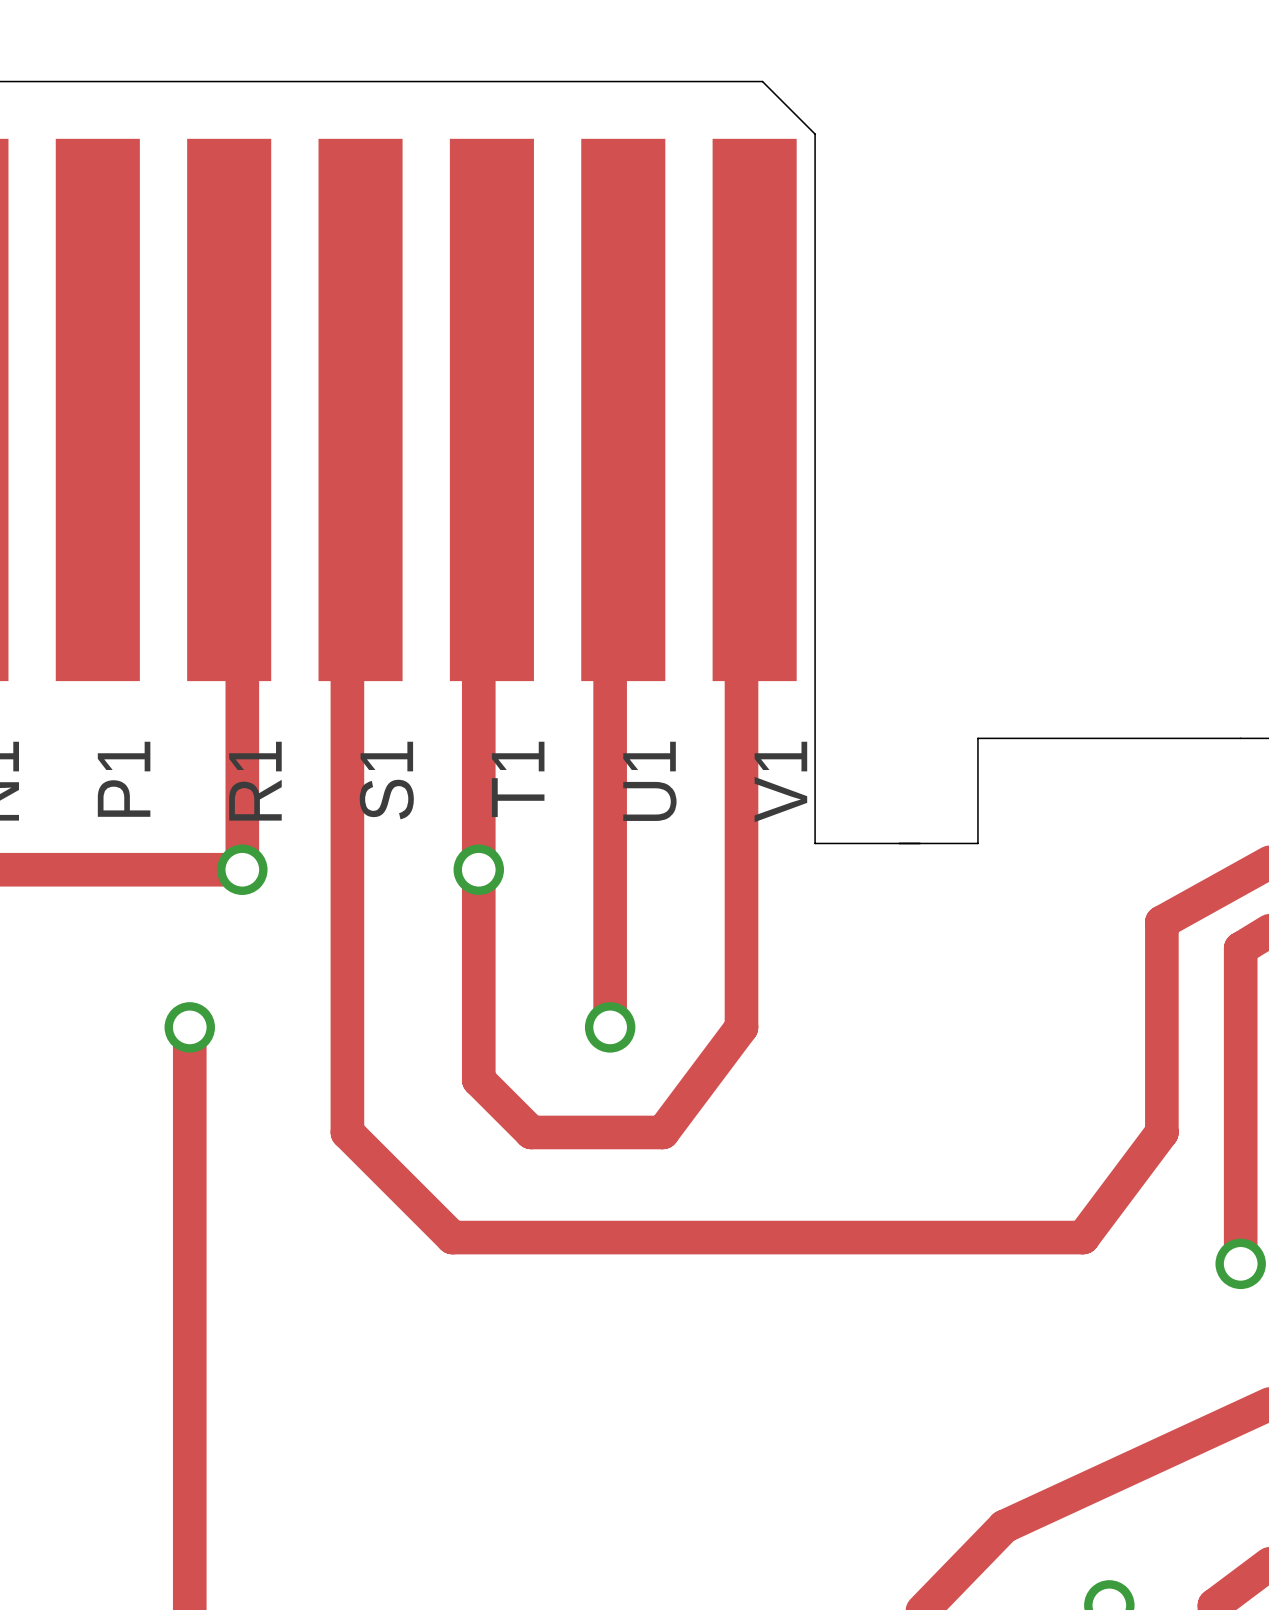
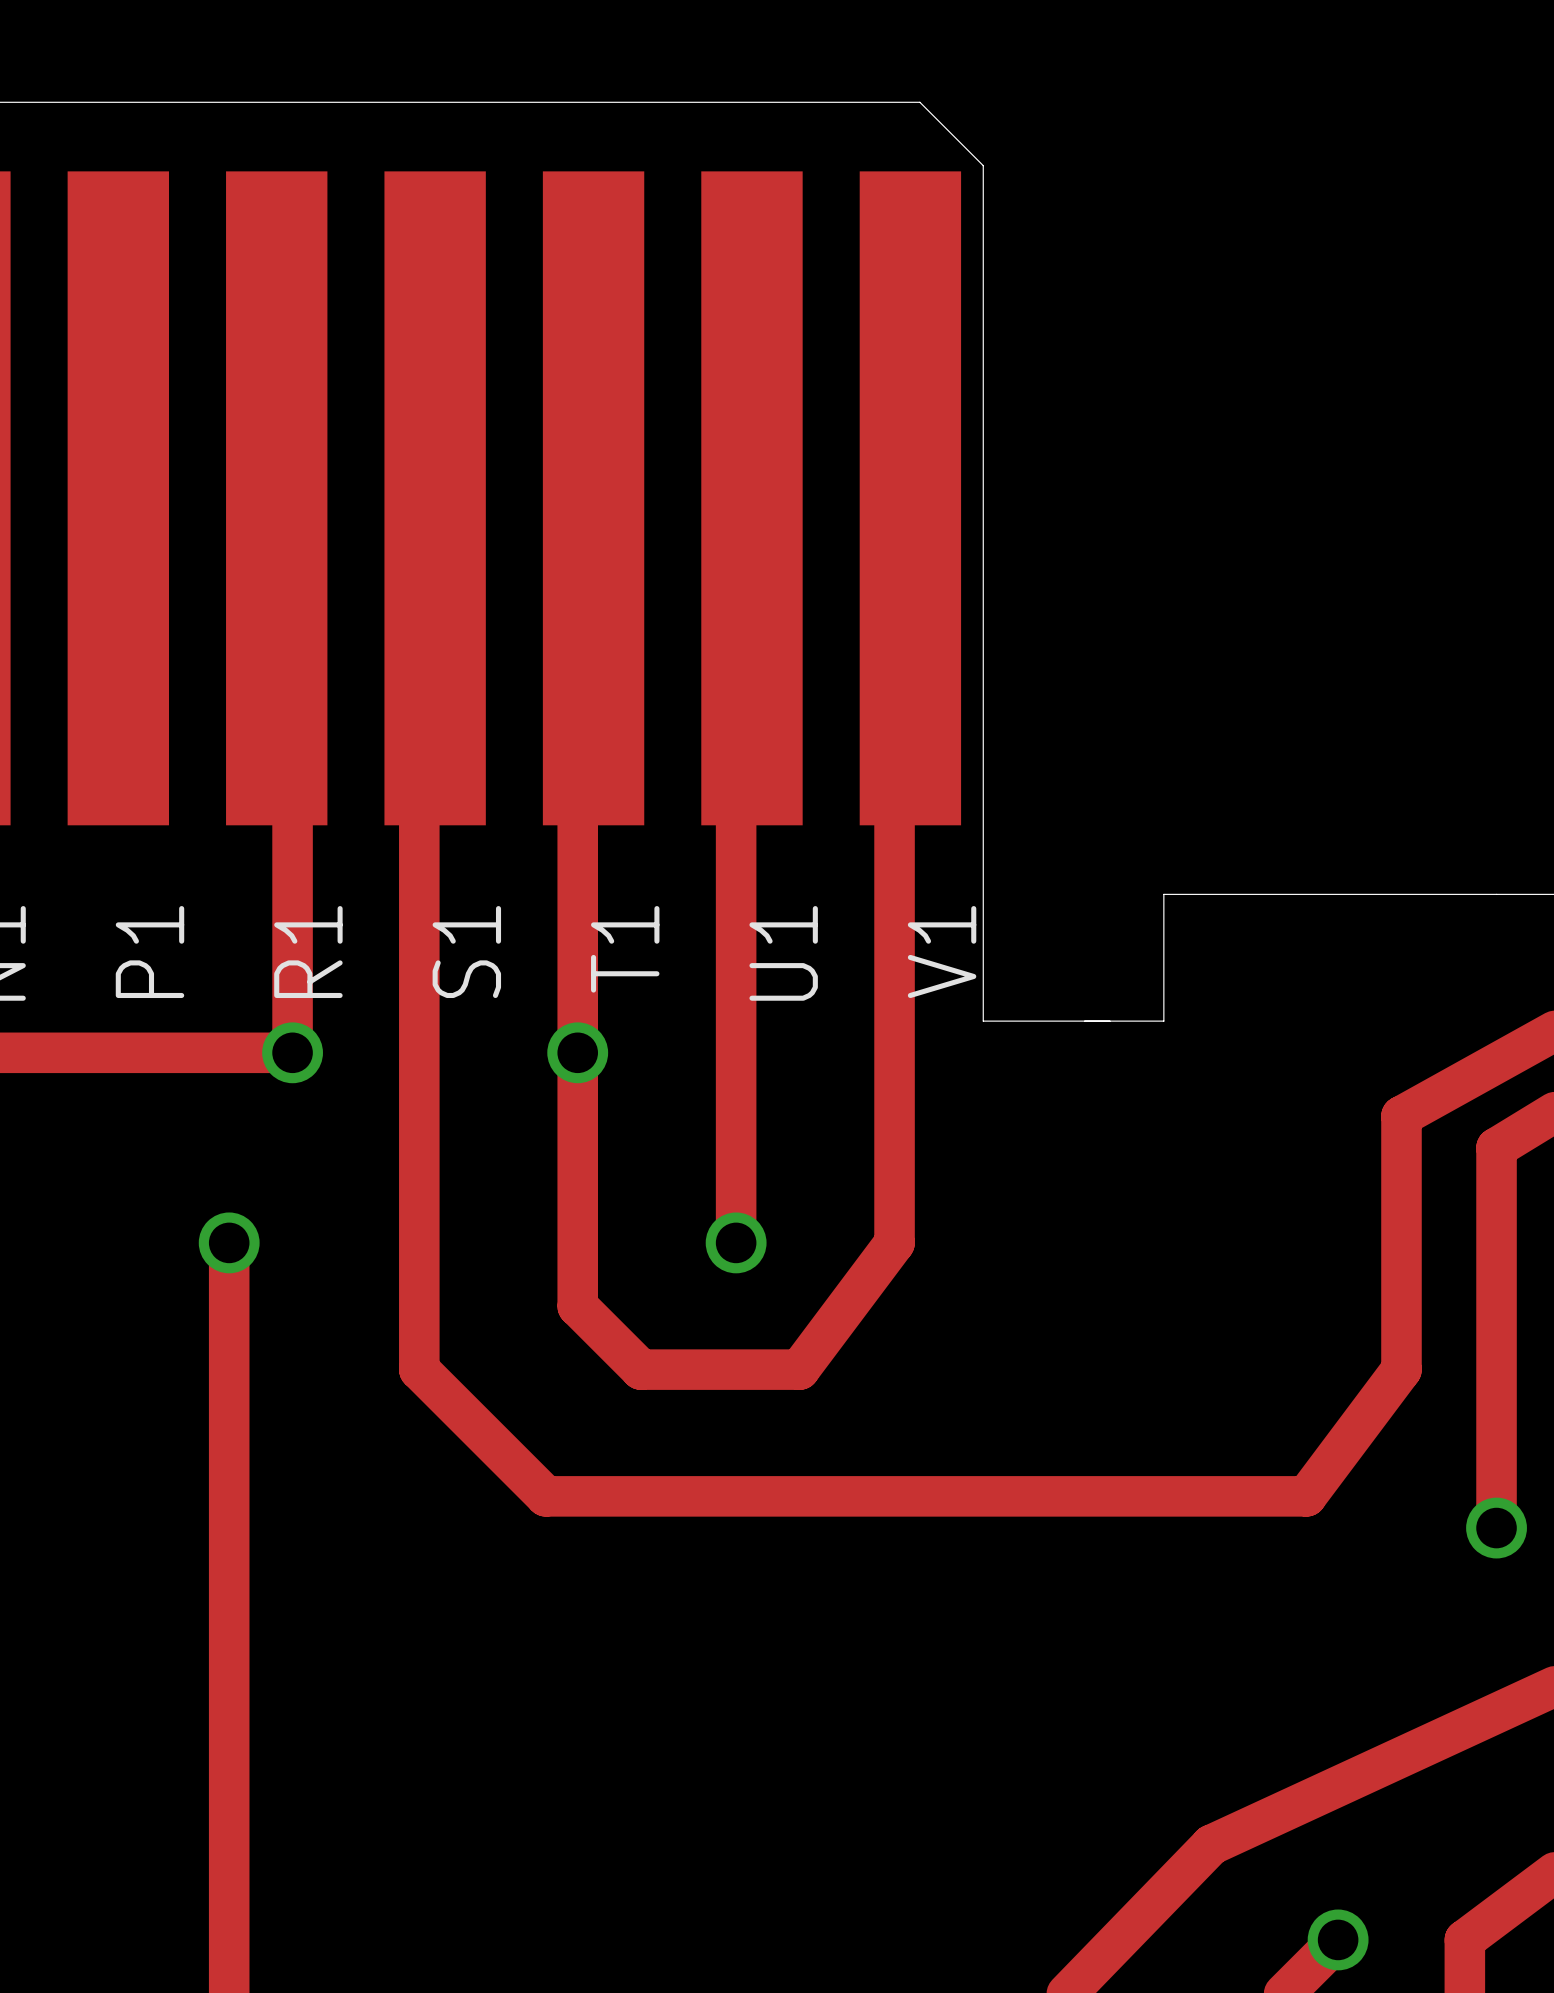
board edge: (977, 738) (977, 843) (964, 843) -> (1179, 894) (1163, 894) (1163, 1021)

